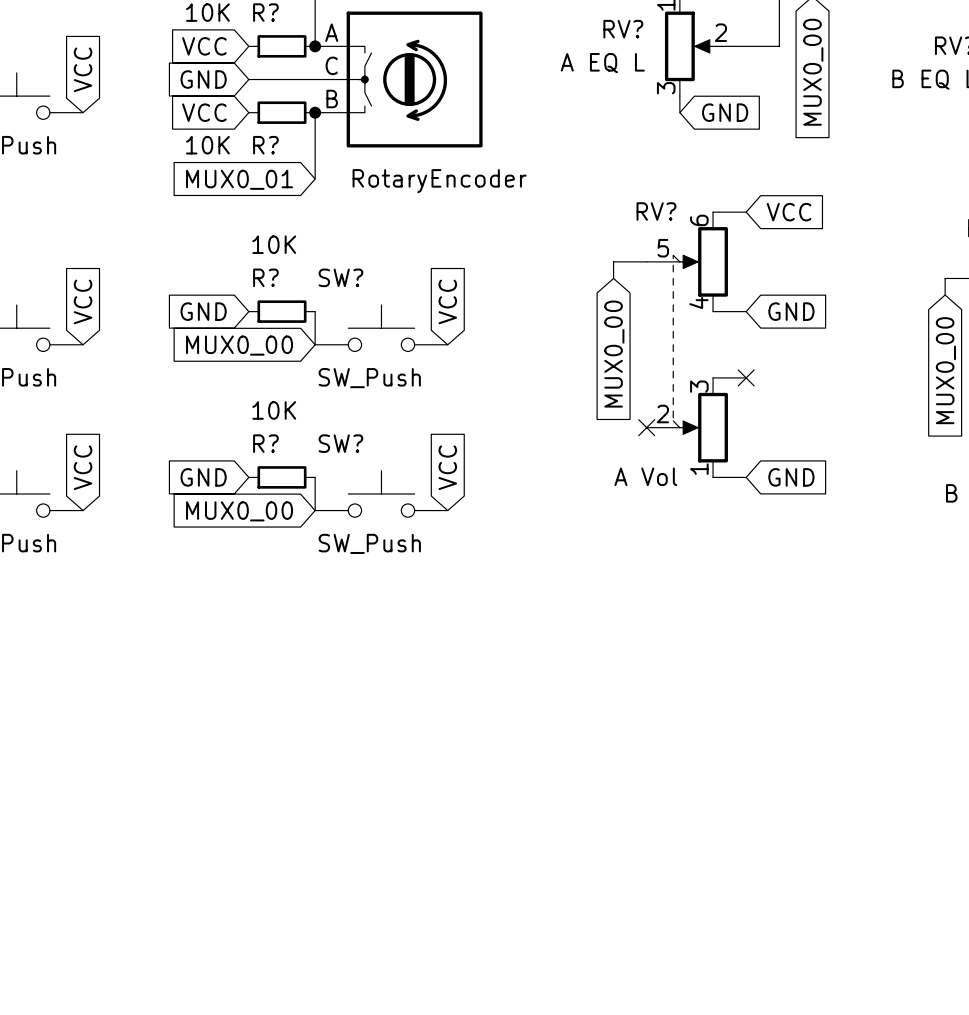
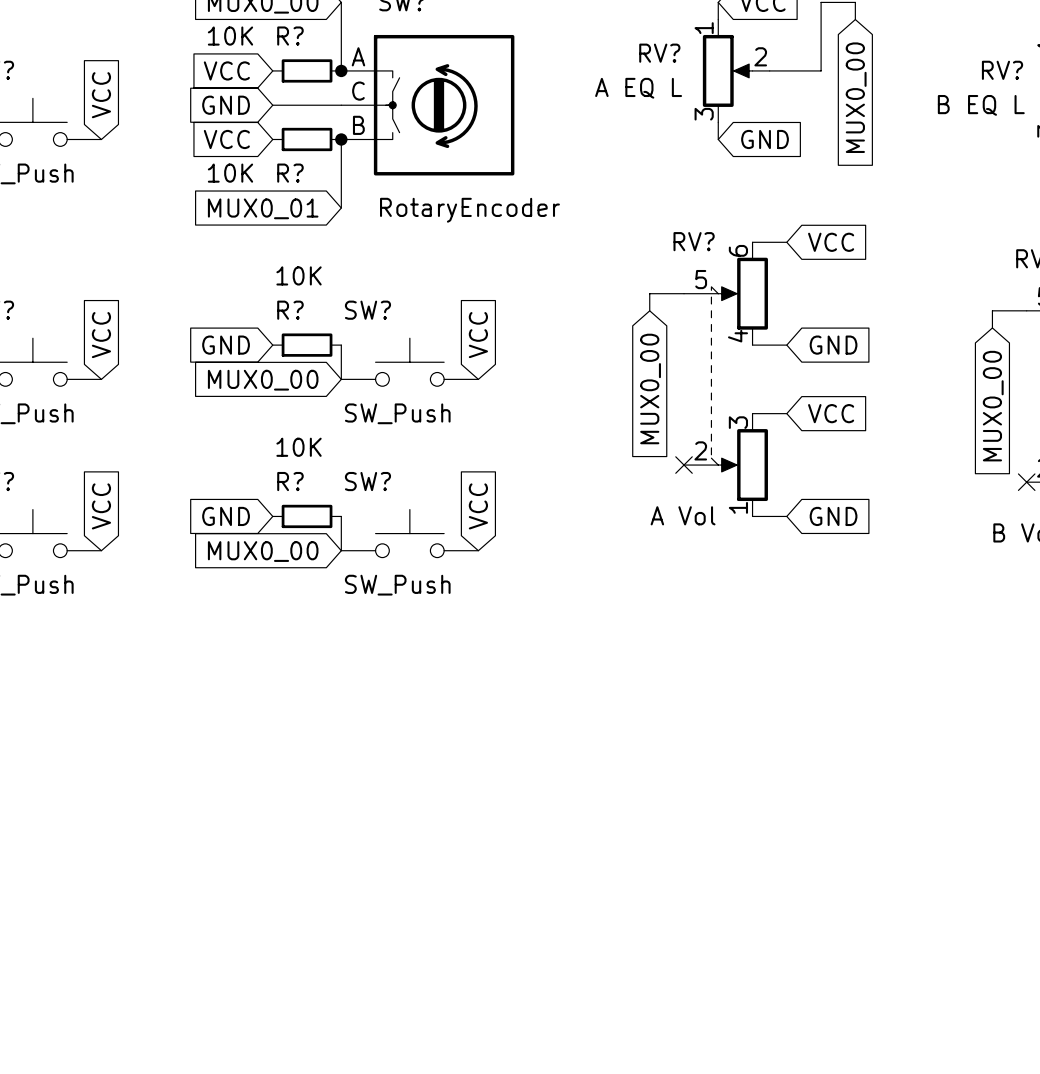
no-connect mark: (746, 377) -> none
global label: none -> VCC (831, 413)

